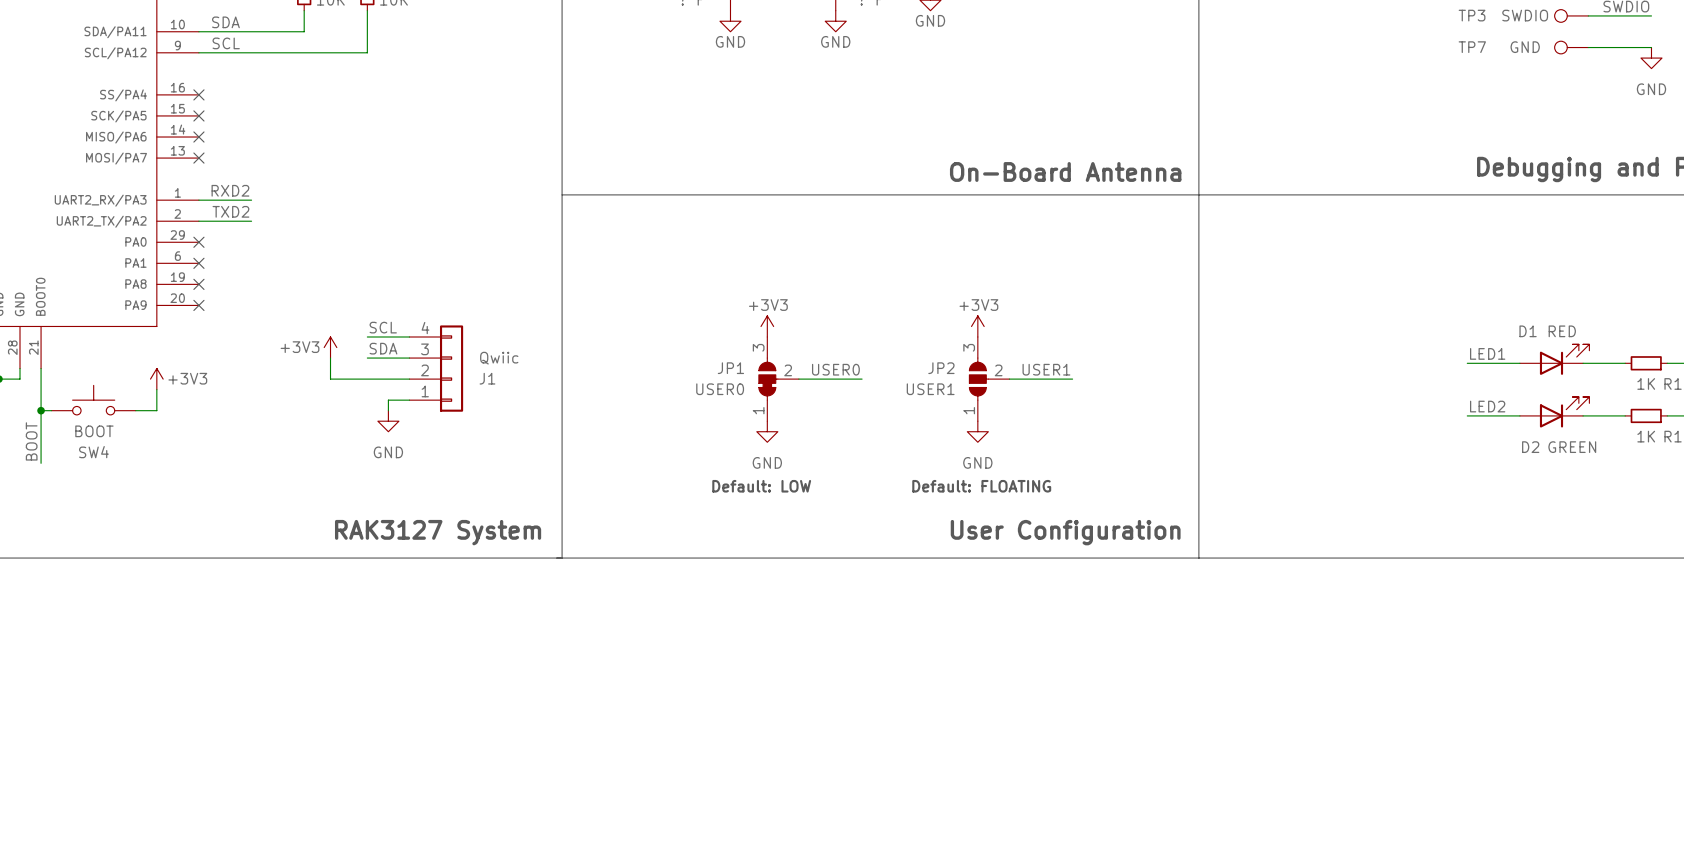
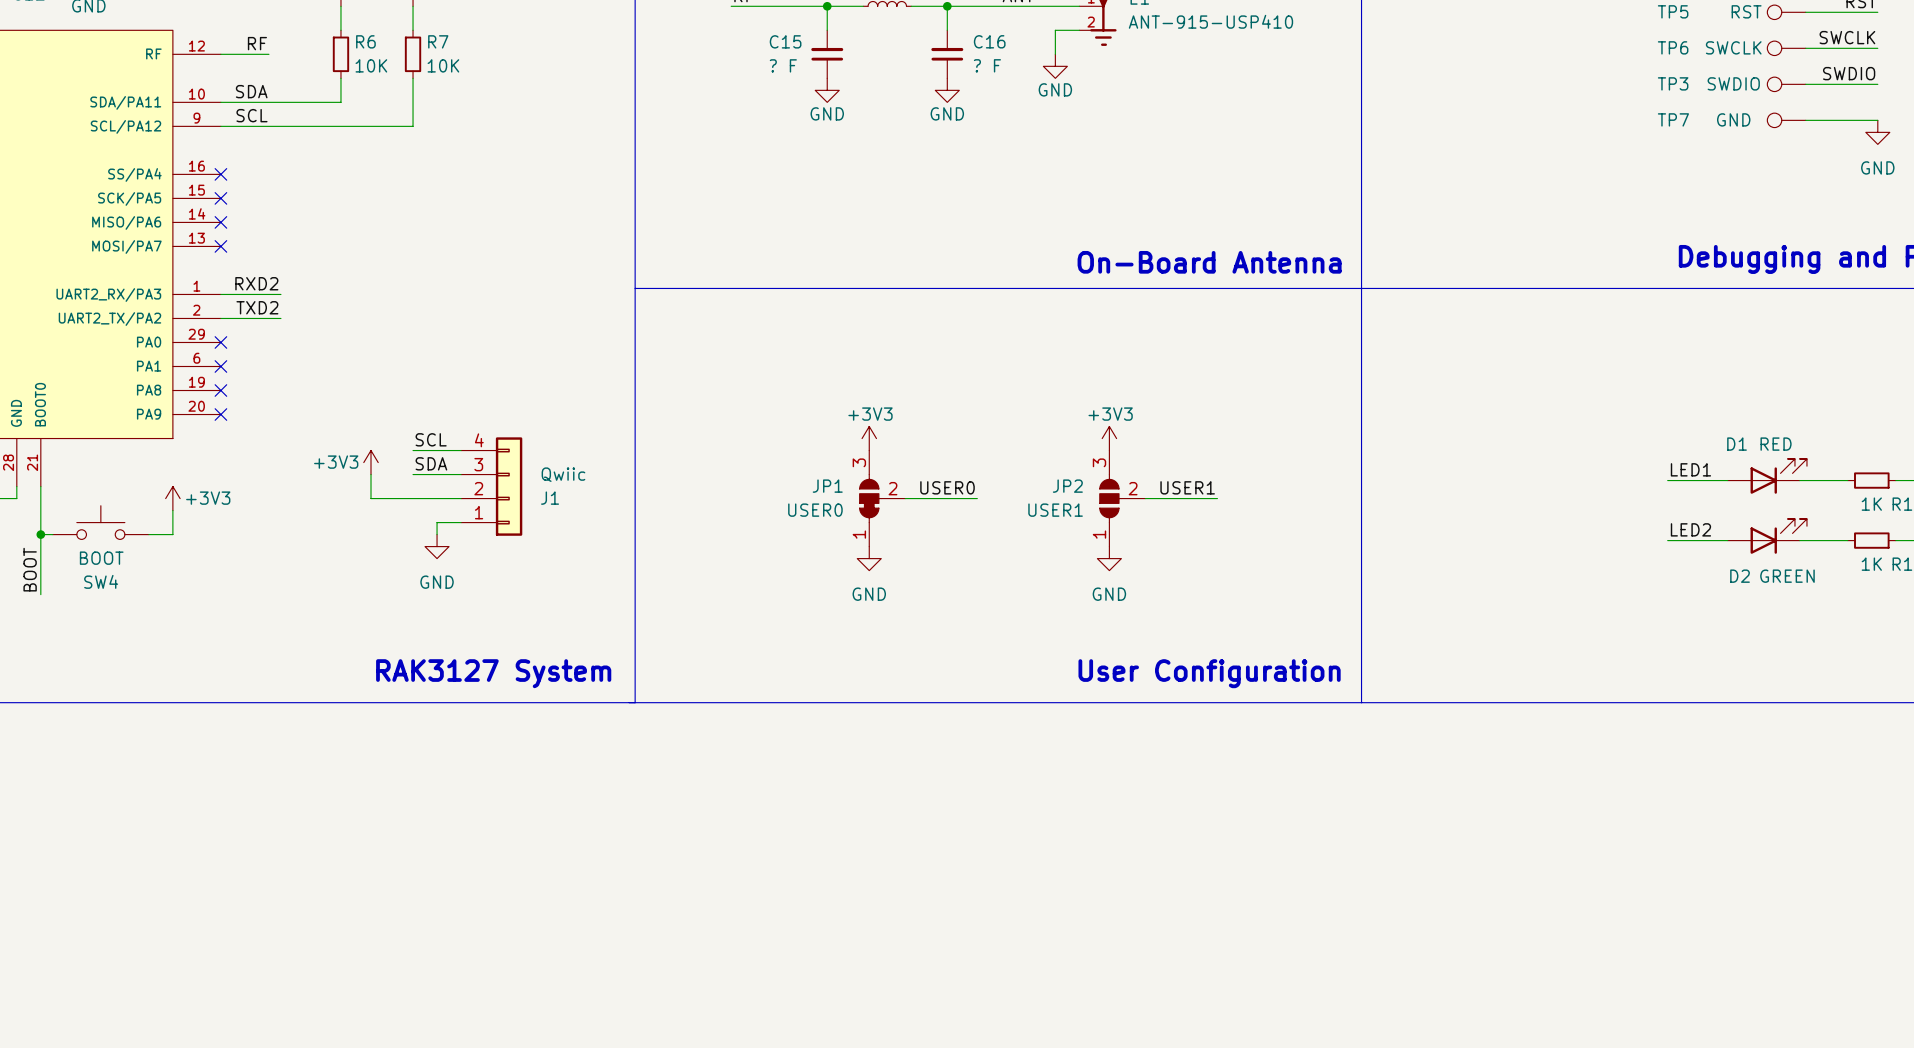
text: Default: LOW (761, 486) -> none
text: Default: FLOATING (981, 486) -> none

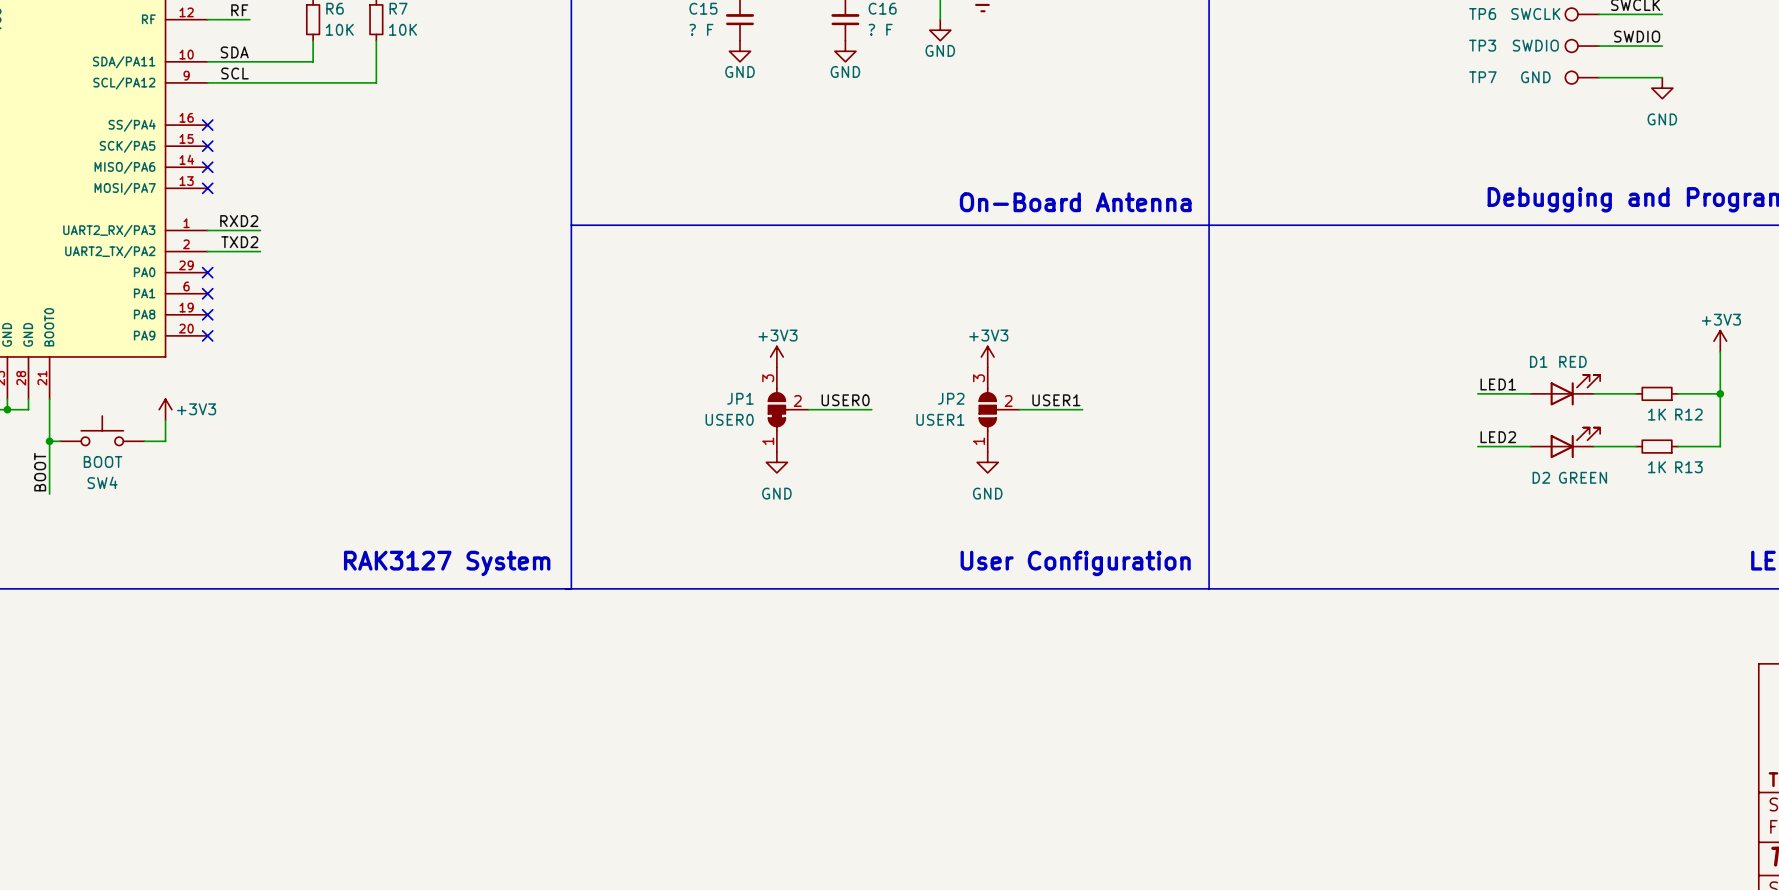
label: SCL (431, 439) -> none
wire: (413, 450) (461, 450) -> none
power symbol: +3V3 (371, 462) -> none
label: SDA (431, 463) -> none
wire: (371, 474) (371, 498) (461, 498) -> none
wire: (413, 474) (461, 474) -> none
J1: Qwiic (491, 486) -> none
wire: (461, 522) (437, 522) (437, 534) -> none
power symbol: GND (437, 546) -> none

